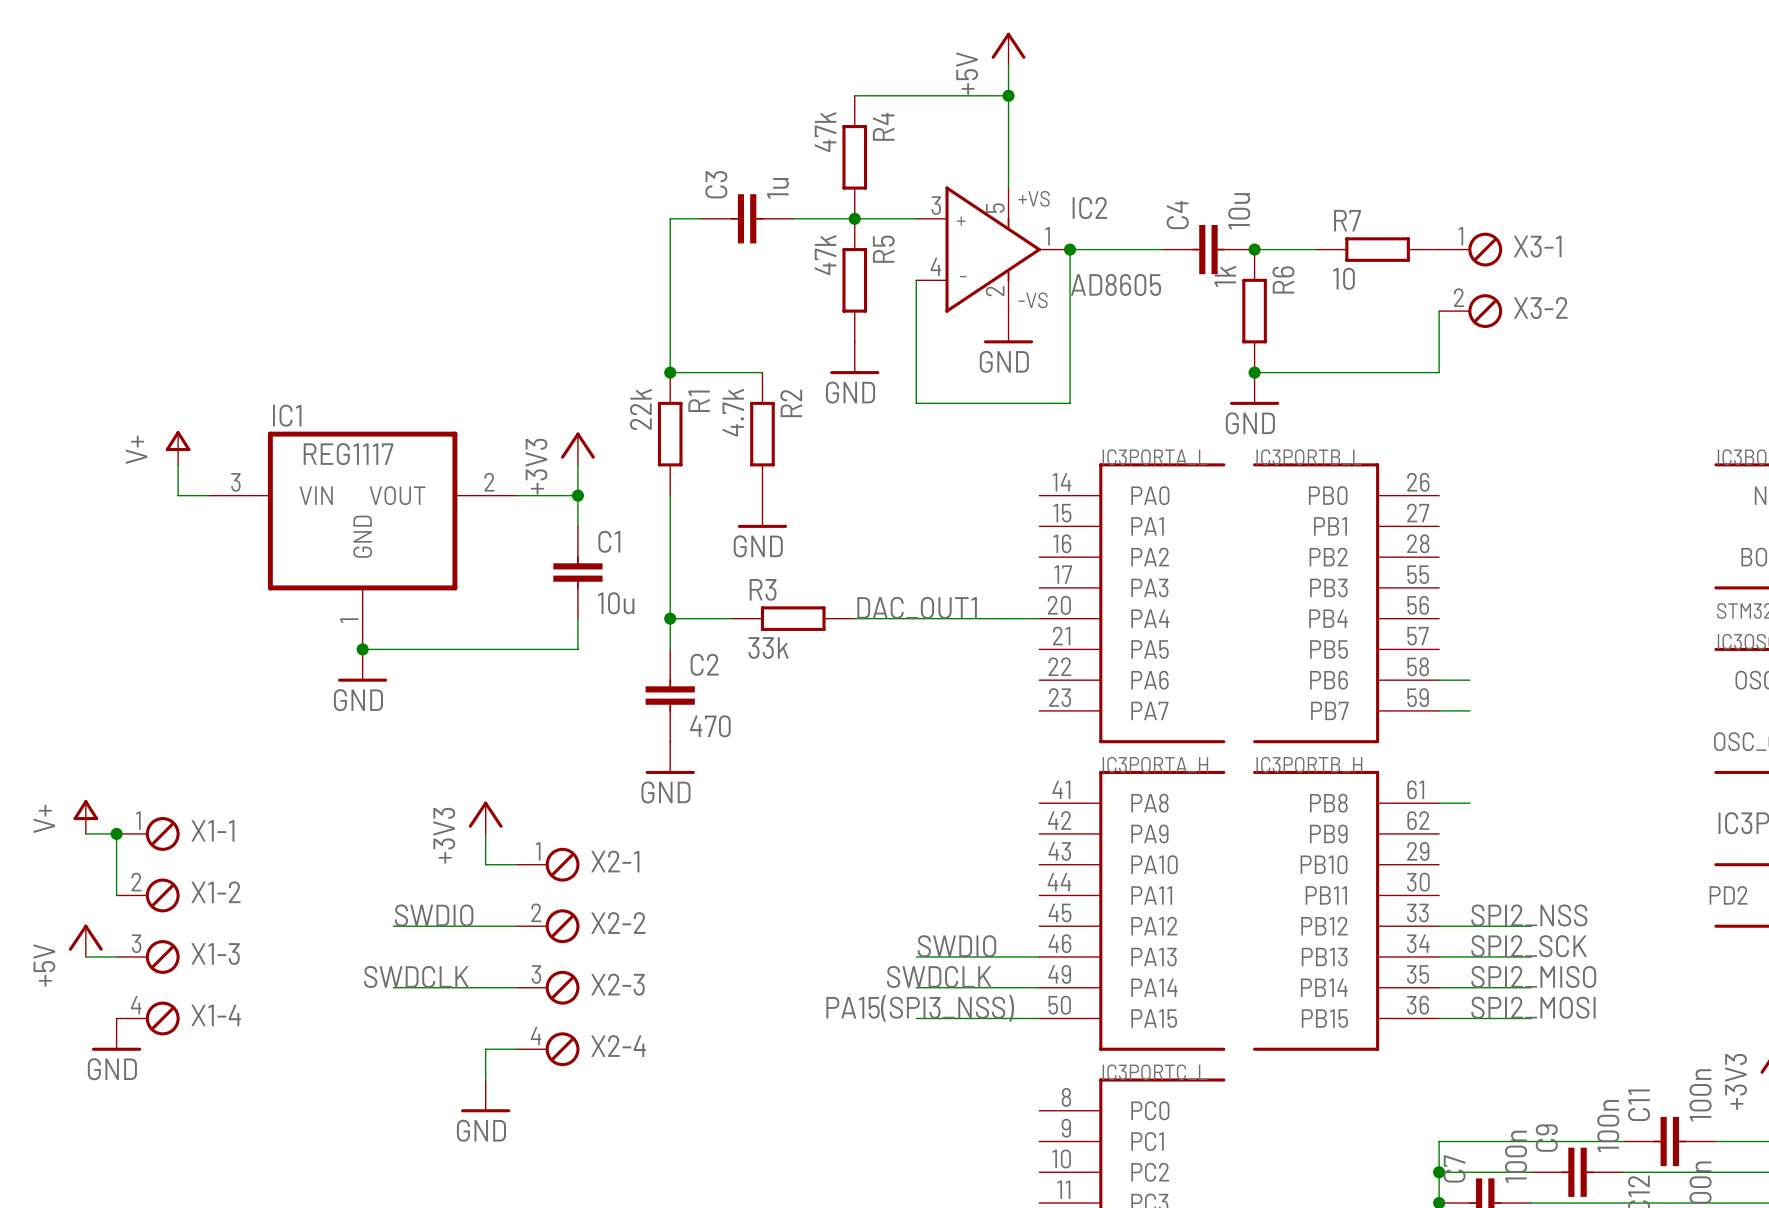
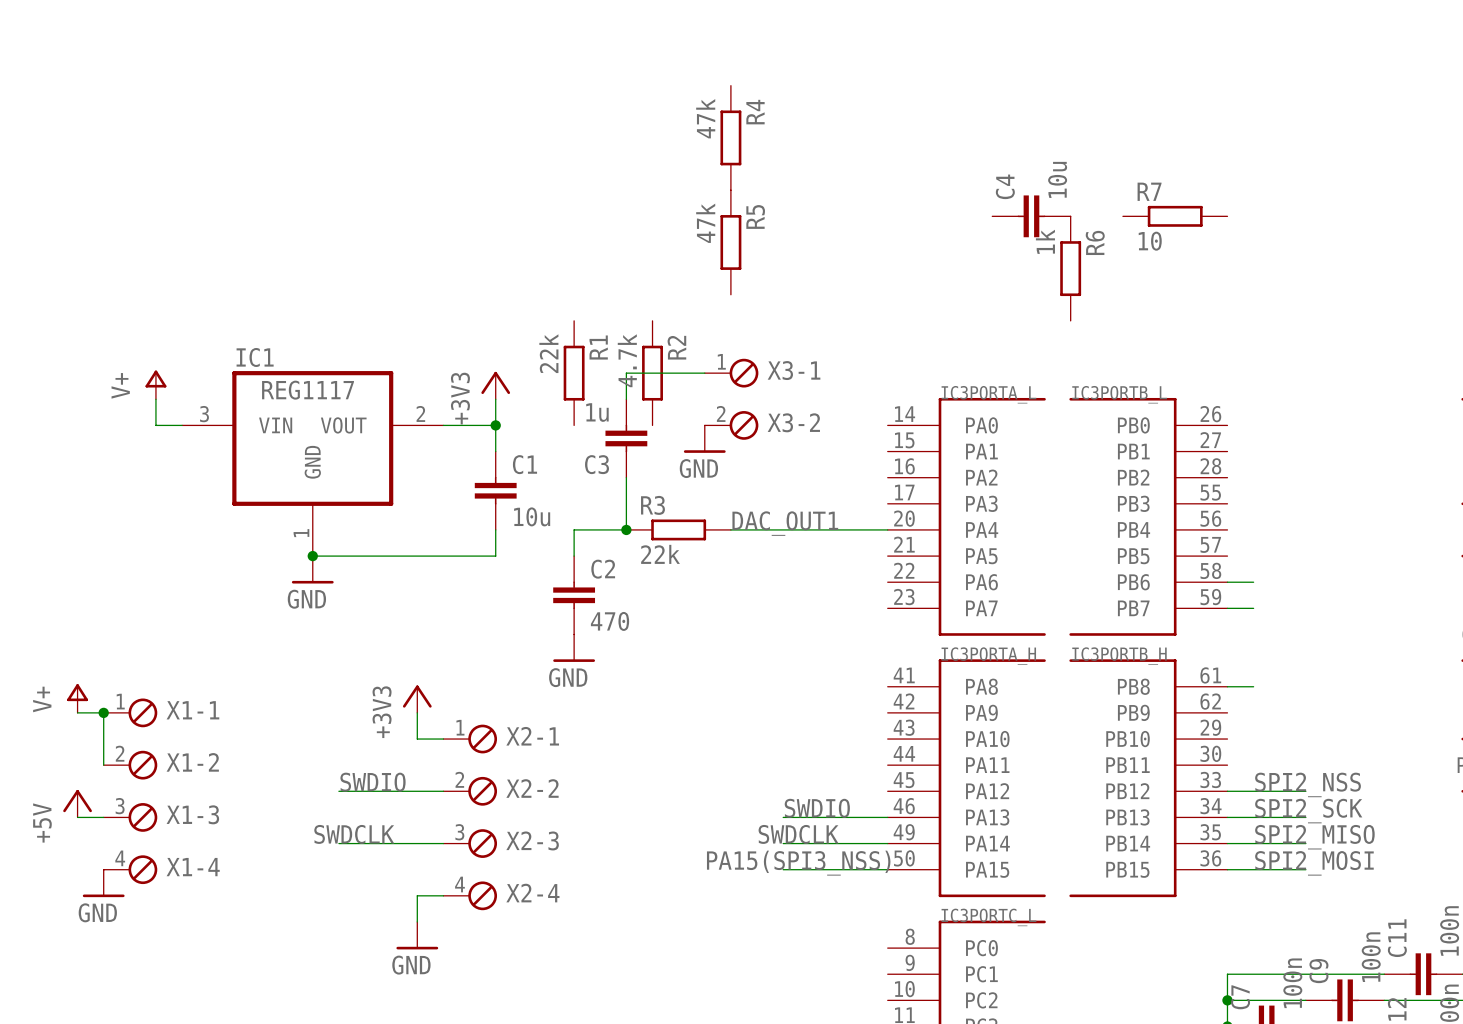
power symbol: +5V (1008, 48) -> none
wire: (1008, 65) (1008, 188) -> none
wire: (854, 95) (1008, 95) -> none
junction: (1008, 95) -> none
C3 name position: C3 (716, 184) -> C3 (597, 464)
C3 value position: 1u (777, 188) -> 1u (597, 412)
wire: (700, 218) (670, 218) (670, 372) (762, 372) -> none
C3 rotation: 0° (747, 218) -> 90° clockwise (626, 438)
C3 position: (747, 218) -> (626, 438)
wire: (793, 218) (916, 218) -> none
junction: (854, 218) -> none
IC2: AD8605 (993, 249) -> none
junction: (1070, 249) -> none
wire: (1162, 249) (1070, 249) (1070, 403) (916, 403) (916, 280) -> none
wire: (1254, 249) (1316, 249) -> none
junction: (1254, 249) -> none
X3-1 position: (1470, 249) -> (731, 373)
wire: (1439, 311) (1439, 372) (1254, 372) -> none
X3-2 position: (1470, 311) -> (731, 425)
power symbol: GND (1008, 327) -> none
power symbol: GND (854, 357) -> none
junction: (670, 372) -> none
junction: (1254, 372) -> none
power symbol: GND (1254, 388) -> none
wire: none -> (704, 373) (626, 373) (626, 399)
wire: (670, 495) (670, 618) -> none
power symbol position: GND (762, 511) -> GND (704, 439)
wire: none -> (626, 477) (626, 529)
junction position: (670, 618) -> (626, 529)
R3 value: 33k (768, 647) -> 22k (660, 554)

